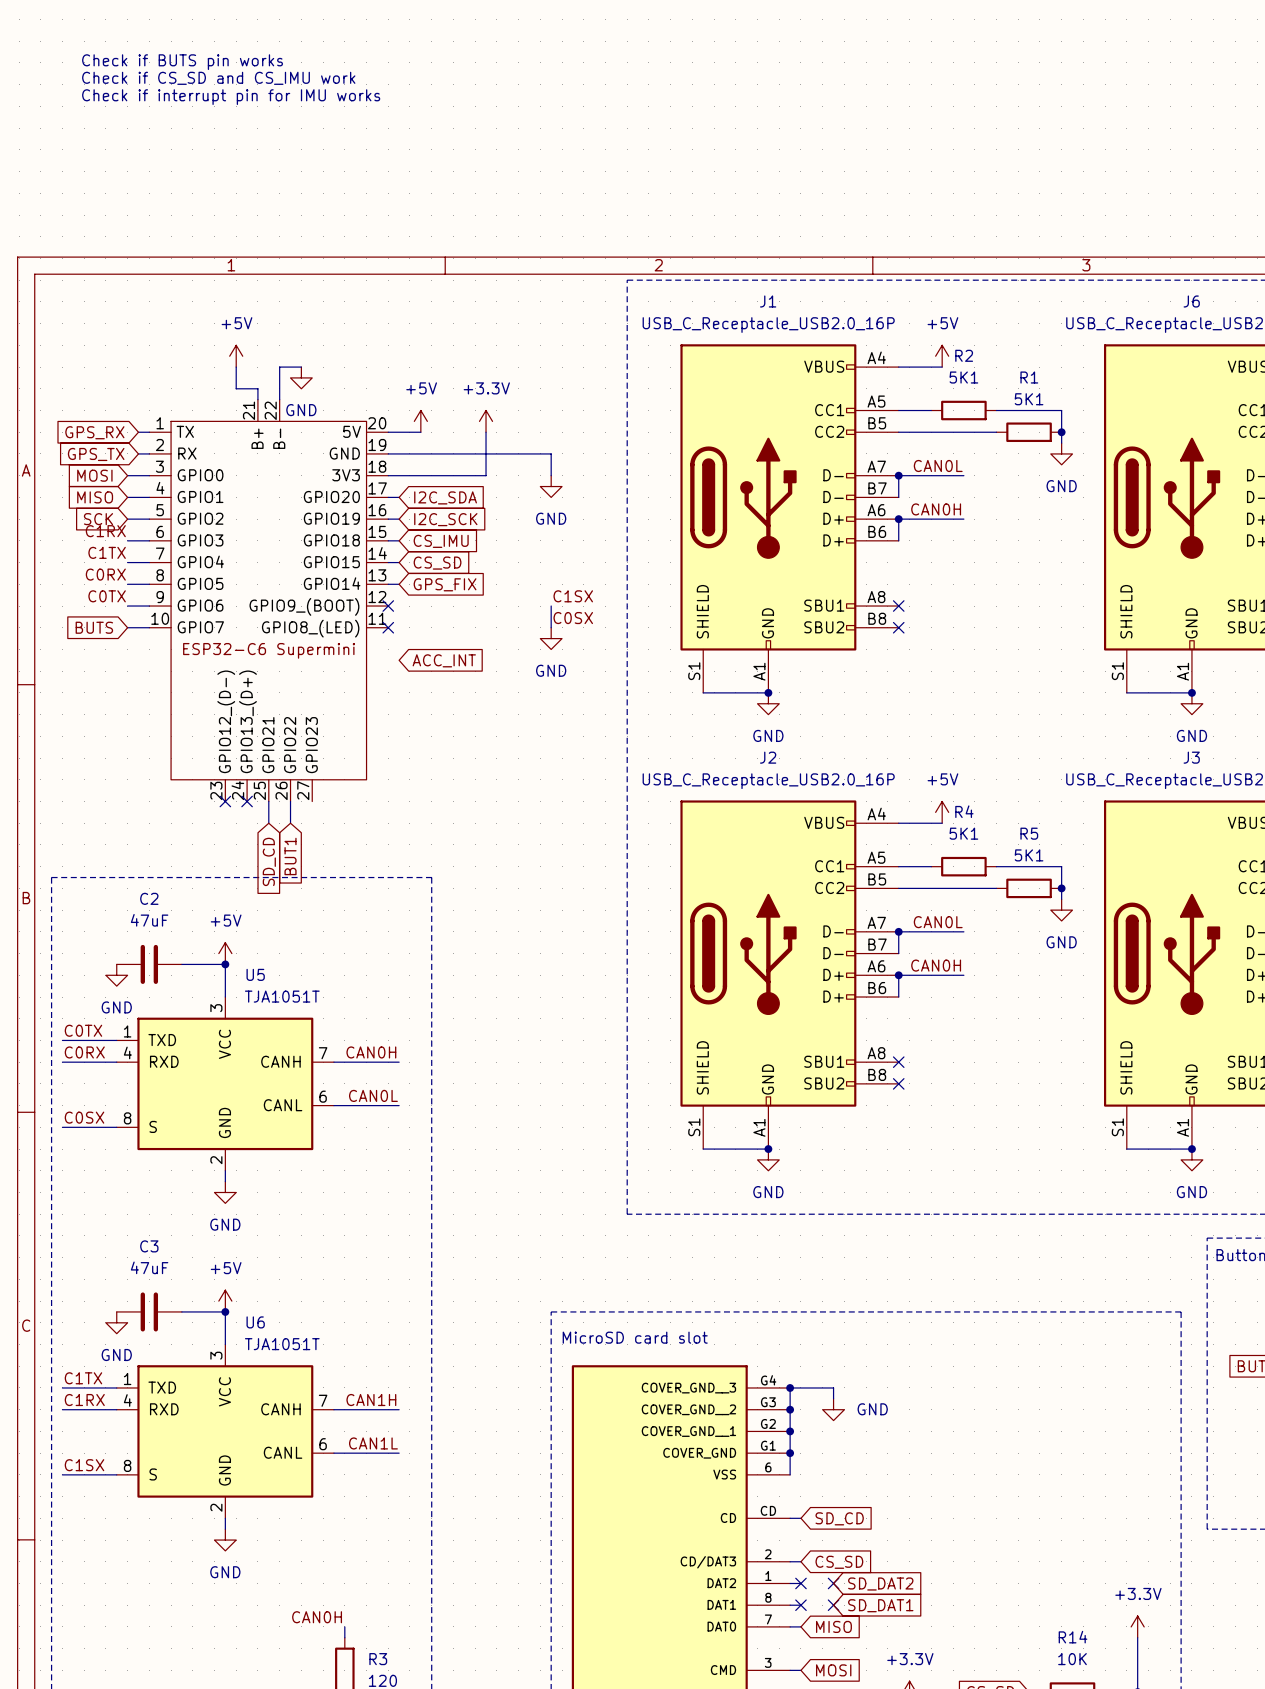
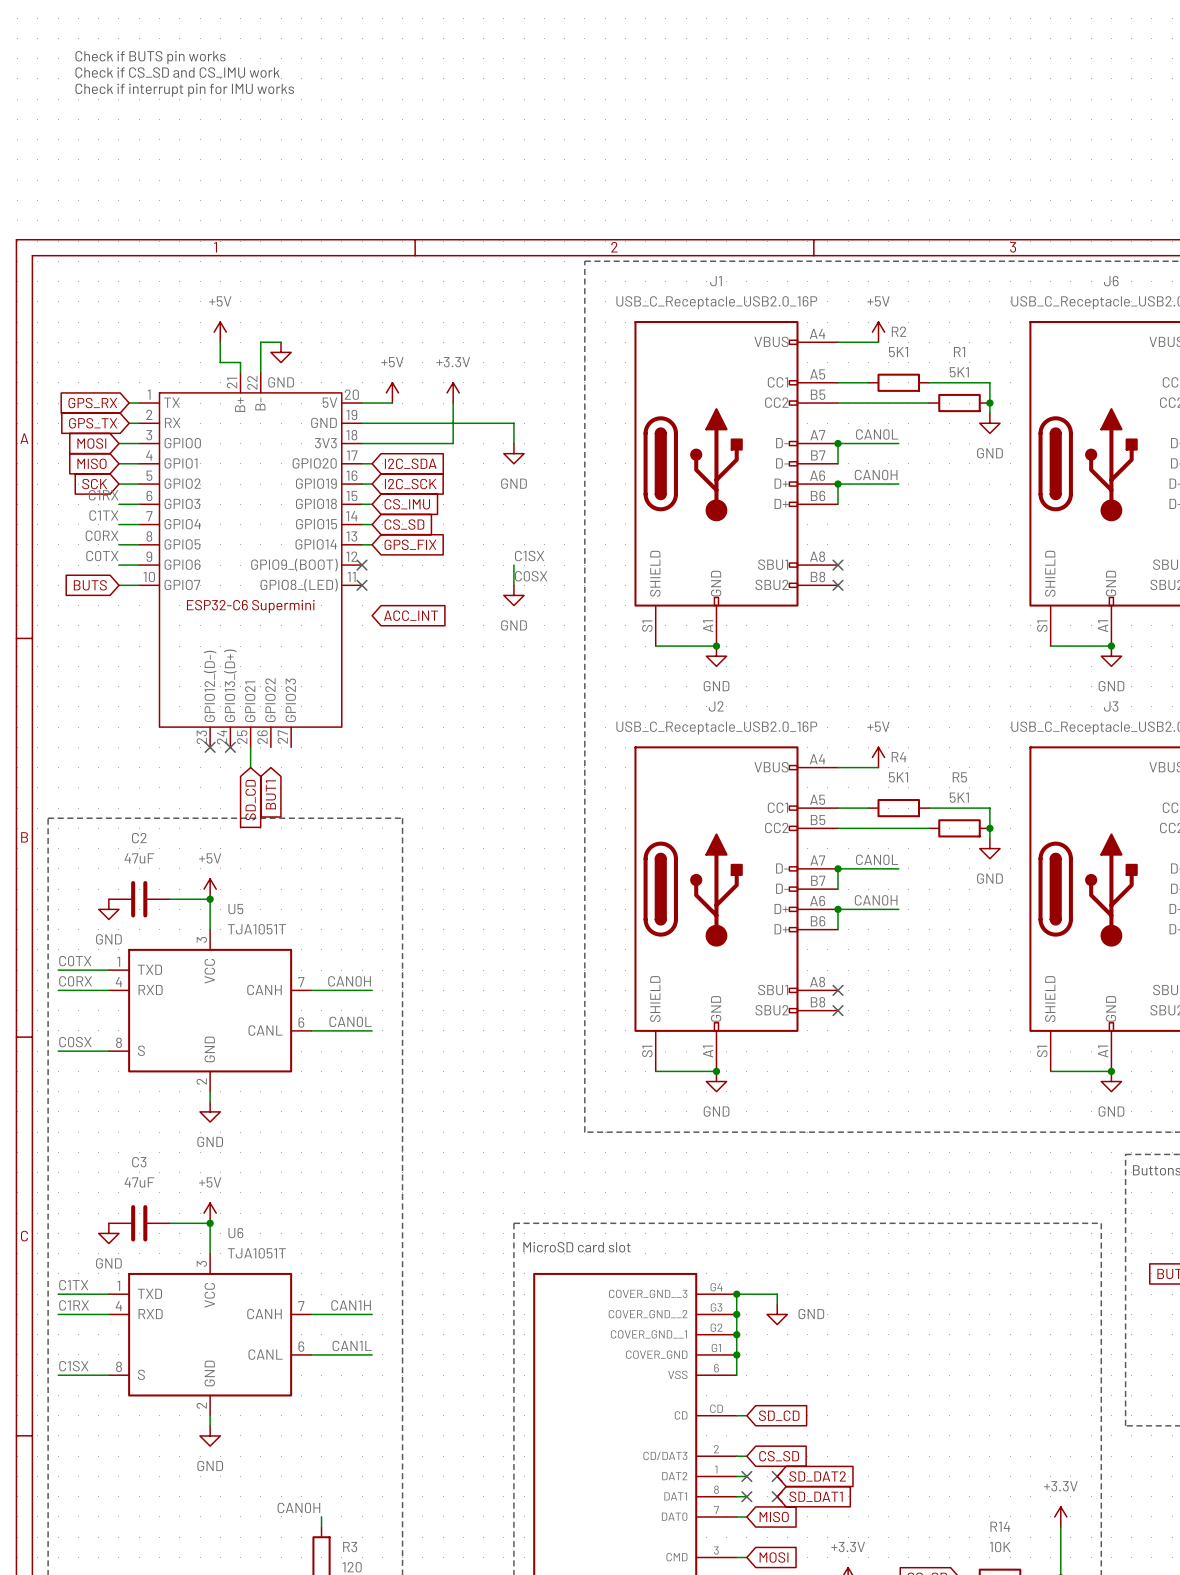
wire: (290, 801) (290, 823) -> none

